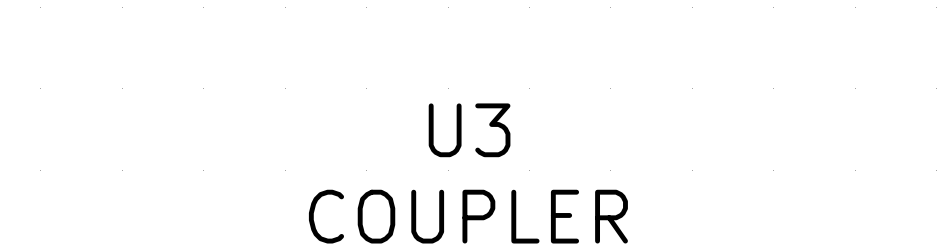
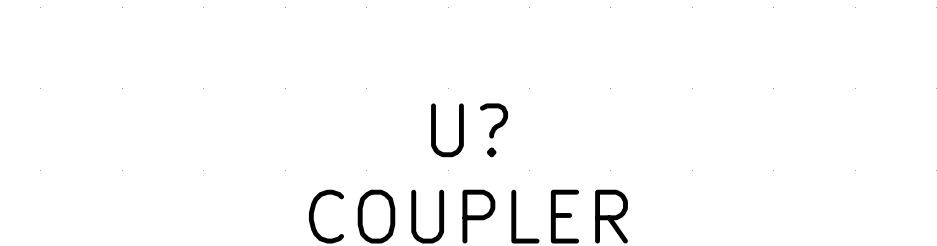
U3 name: U3 (469, 130) -> U? (469, 130)

